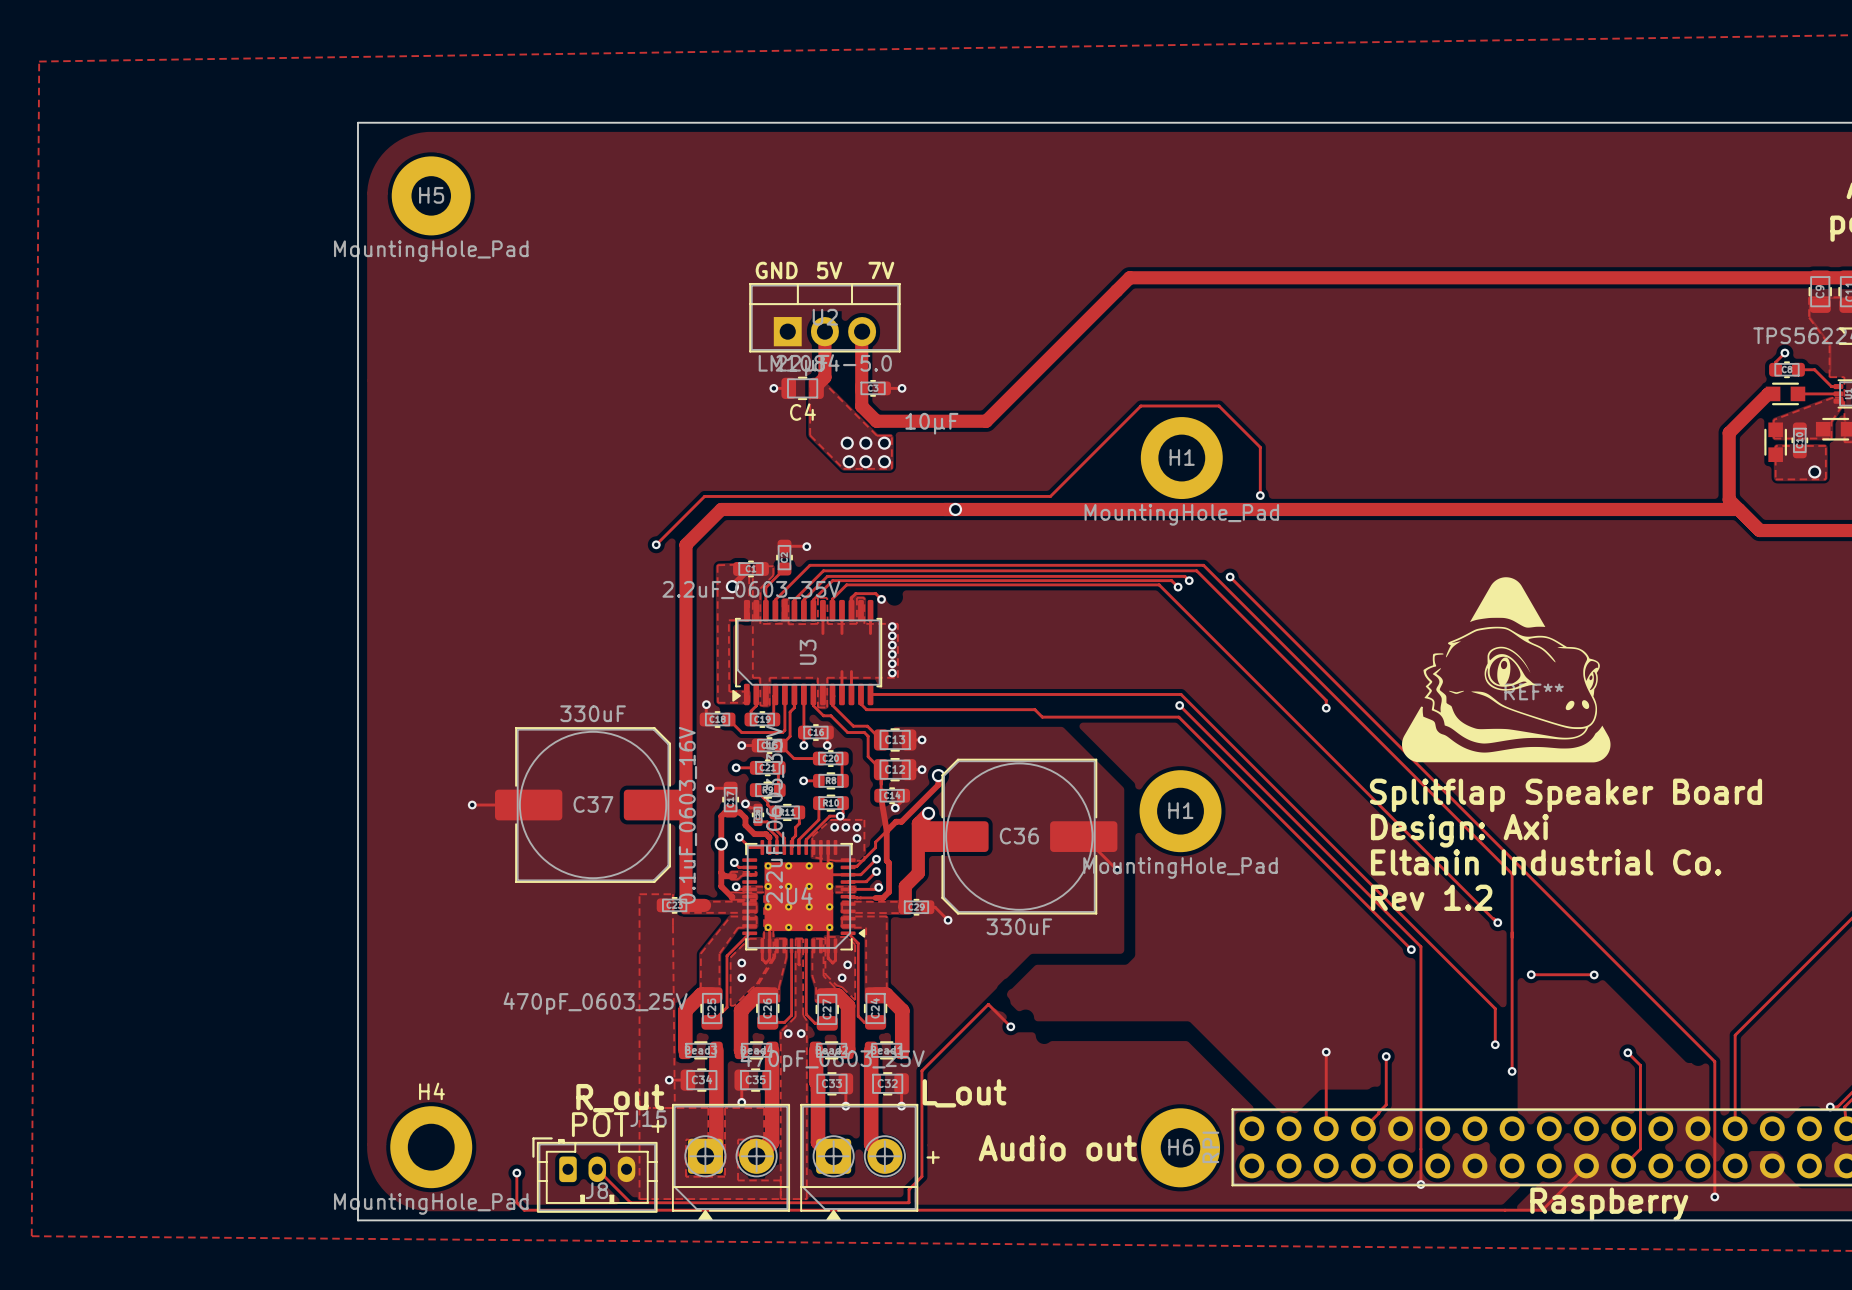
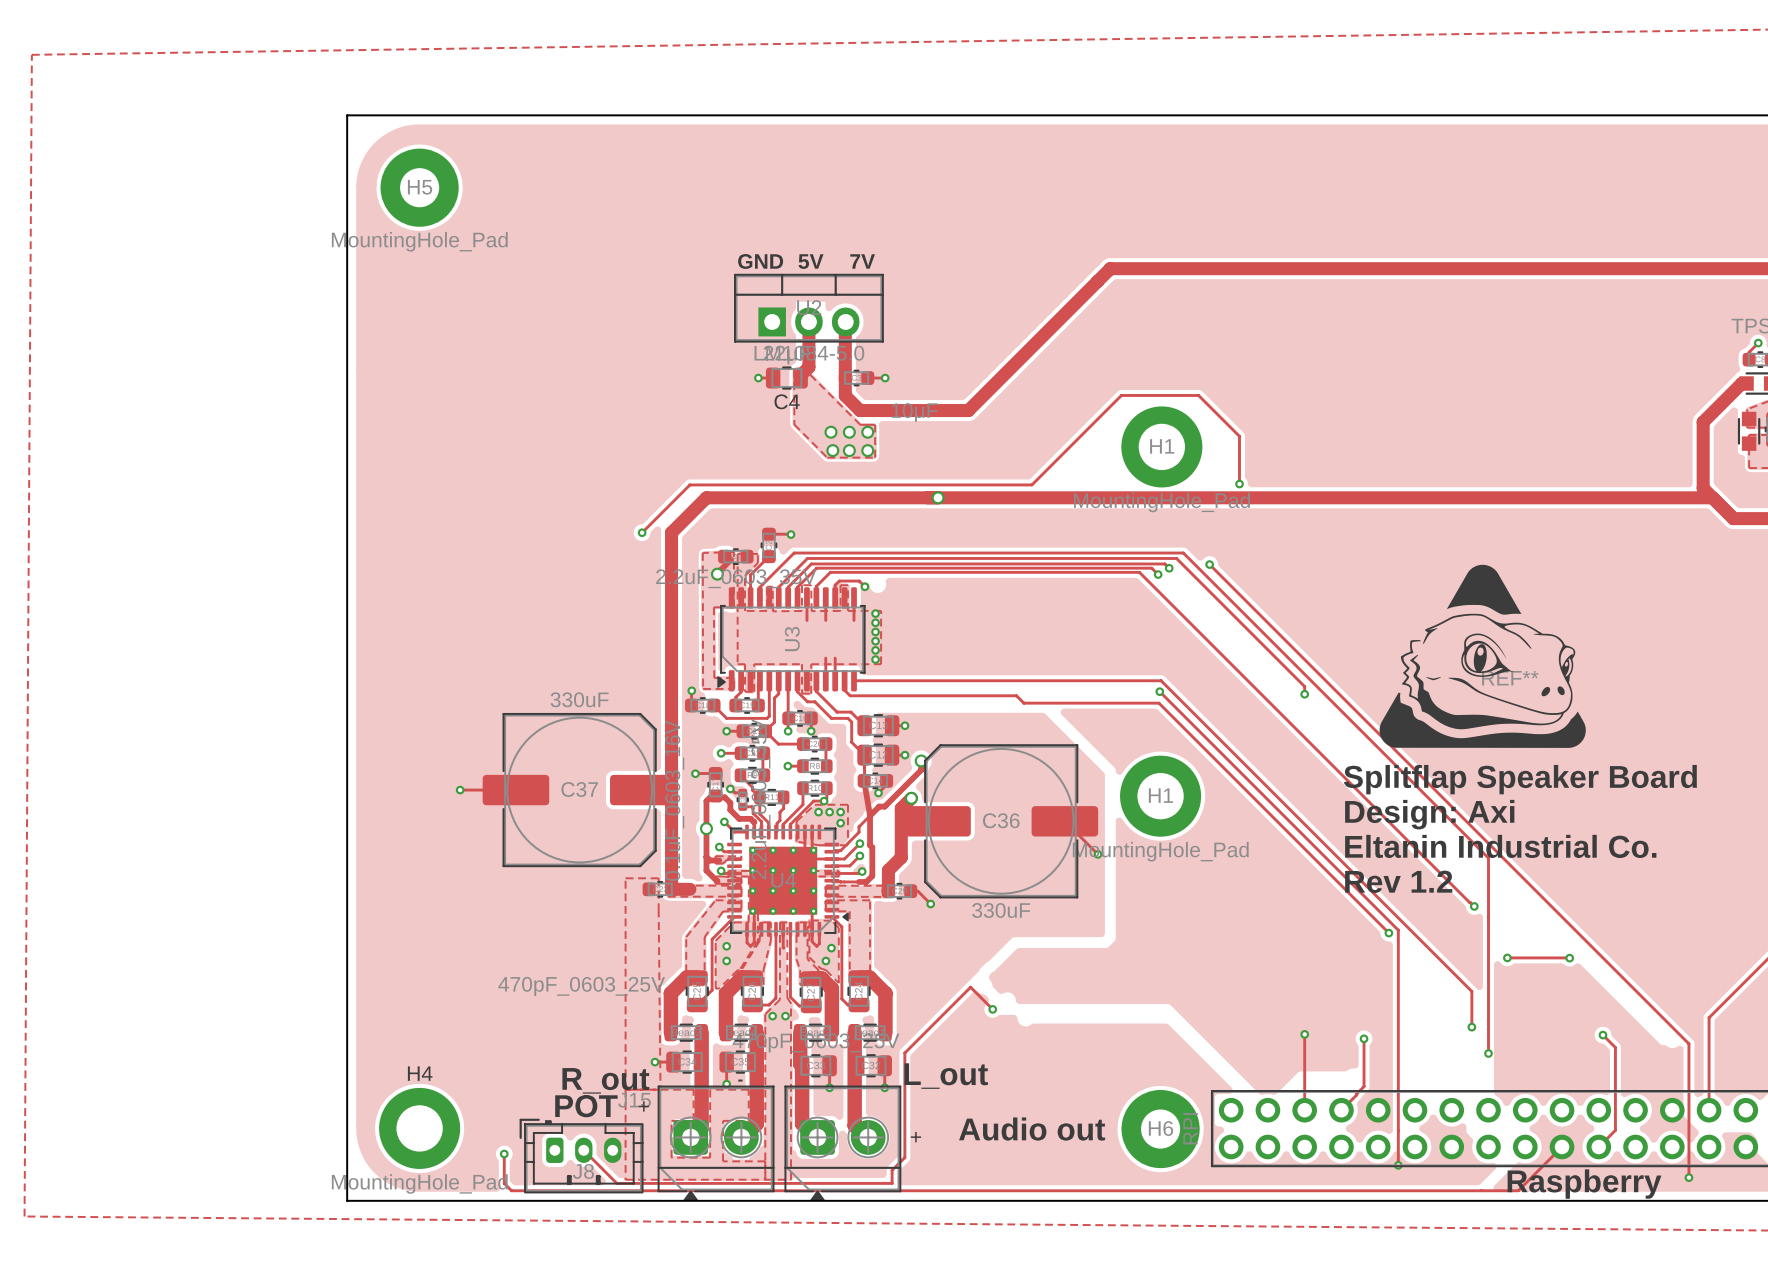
text: none -> - (740, 1080)

